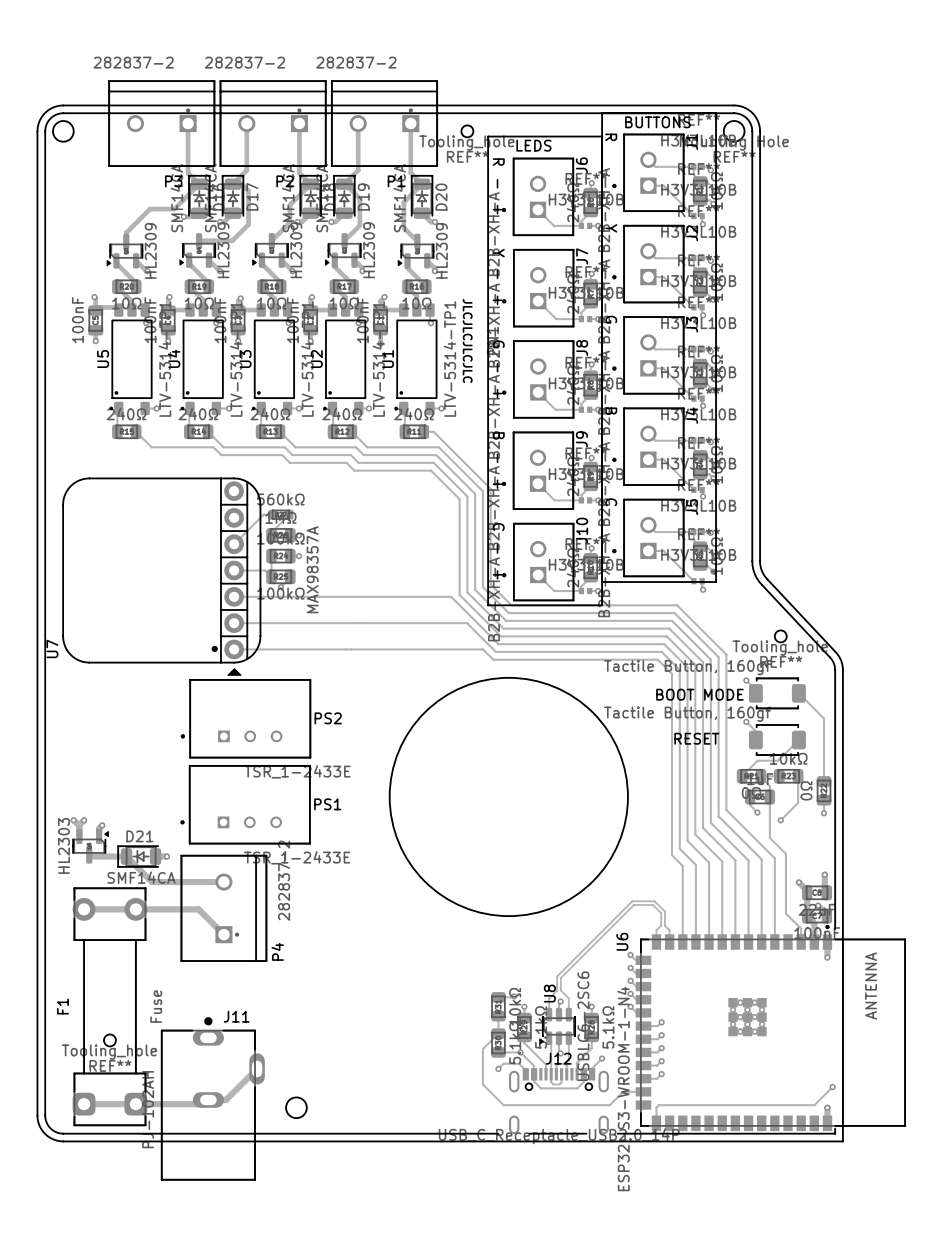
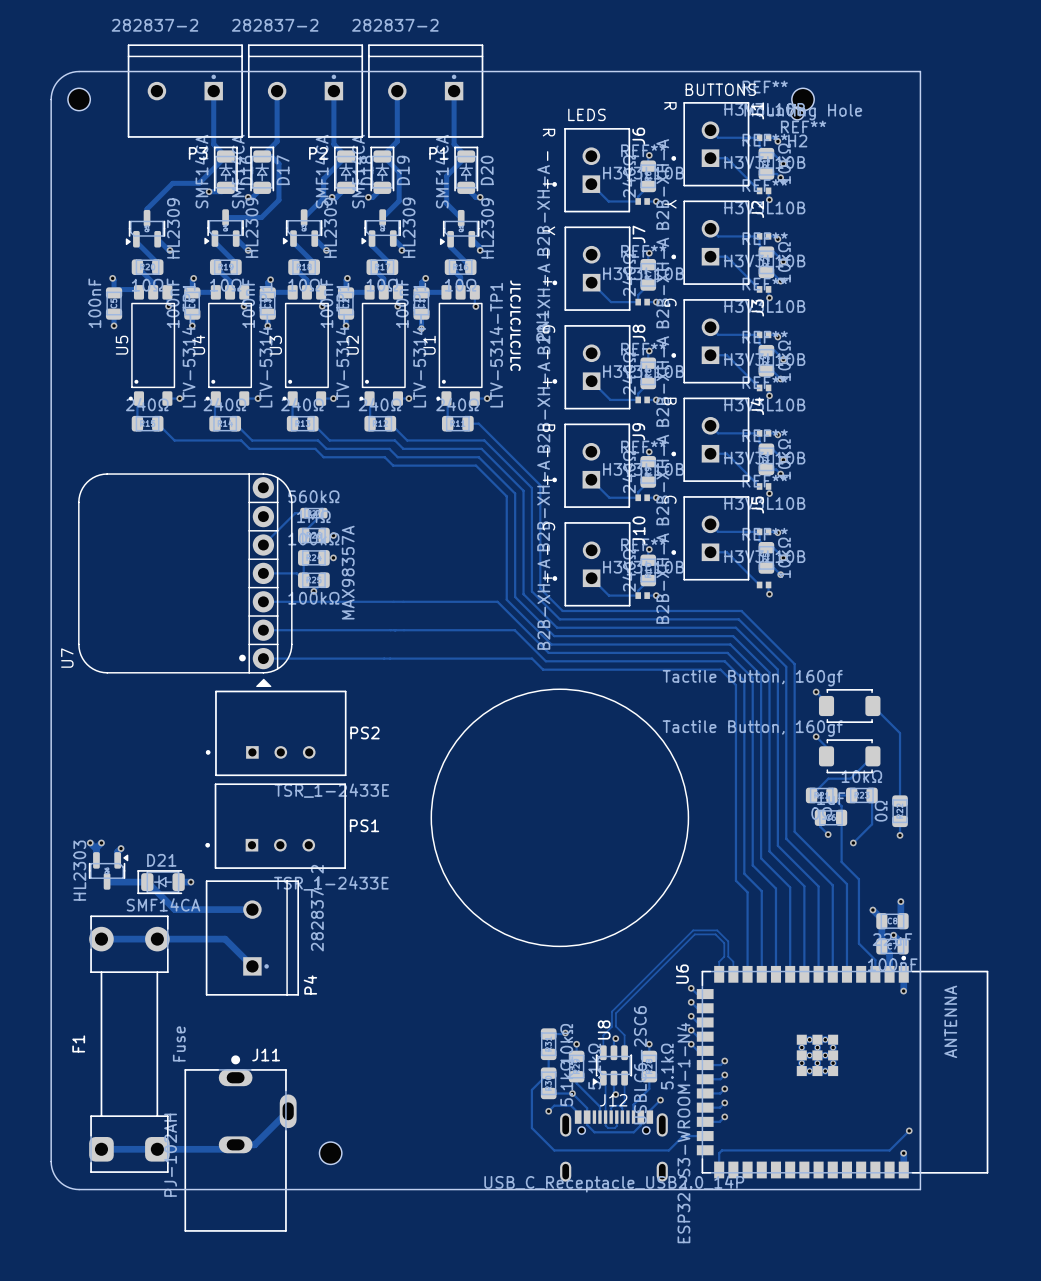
board edge: (734, 105) (750, 111) (757, 120) (759, 128) (760, 566) (765, 577) (837, 653) (842, 670) -> (803, 71) (920, 71) (920, 680)
line: (602, 113) (602, 605) (488, 605) (488, 136) (602, 136) -> none
line: (716, 113) (716, 582) (602, 582) -> none
REF**: Tooling_hole (467, 131) -> none
H2: none -> (797, 113)
REF**: Tooling_hole (780, 636) -> none
text: BOOT MODE (699, 694) -> none
text: RESET (696, 738) -> none
line: (835, 929) (834, 665) (829, 657) (759, 581) (752, 565) (752, 131) (746, 118) (734, 113) (63, 113) (53, 116) (47, 123) (45, 131) (45, 1115) (47, 1123) (53, 1130) (63, 1133) (498, 1133) -> none
REF**: Tooling_hole (109, 1040) -> none
line: (835, 1128) (835, 1133) (617, 1133) -> none
line: (529, 1133) (586, 1133) -> none

